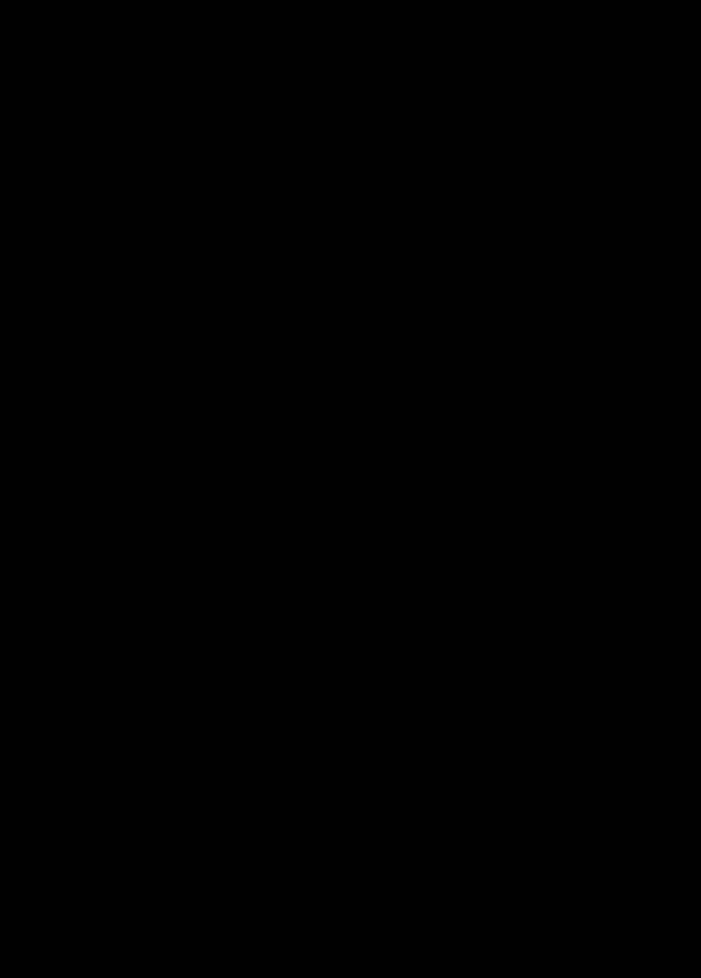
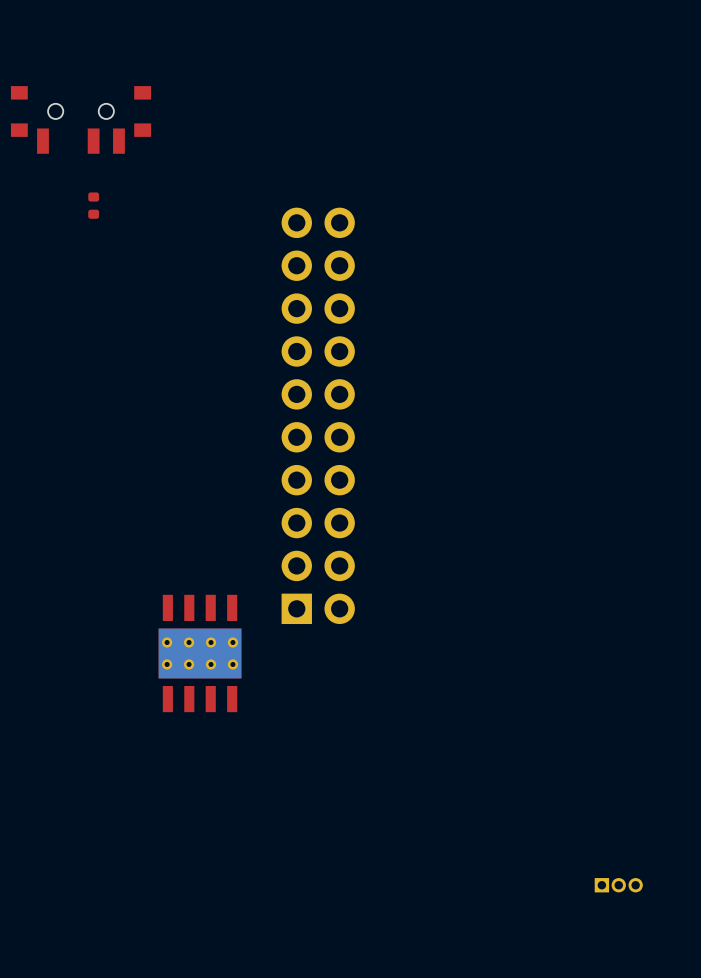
part: none -> (80, 119)
part: none -> (93, 205)
part: none -> (318, 415)
part: none -> (200, 653)
part: none -> (618, 885)

